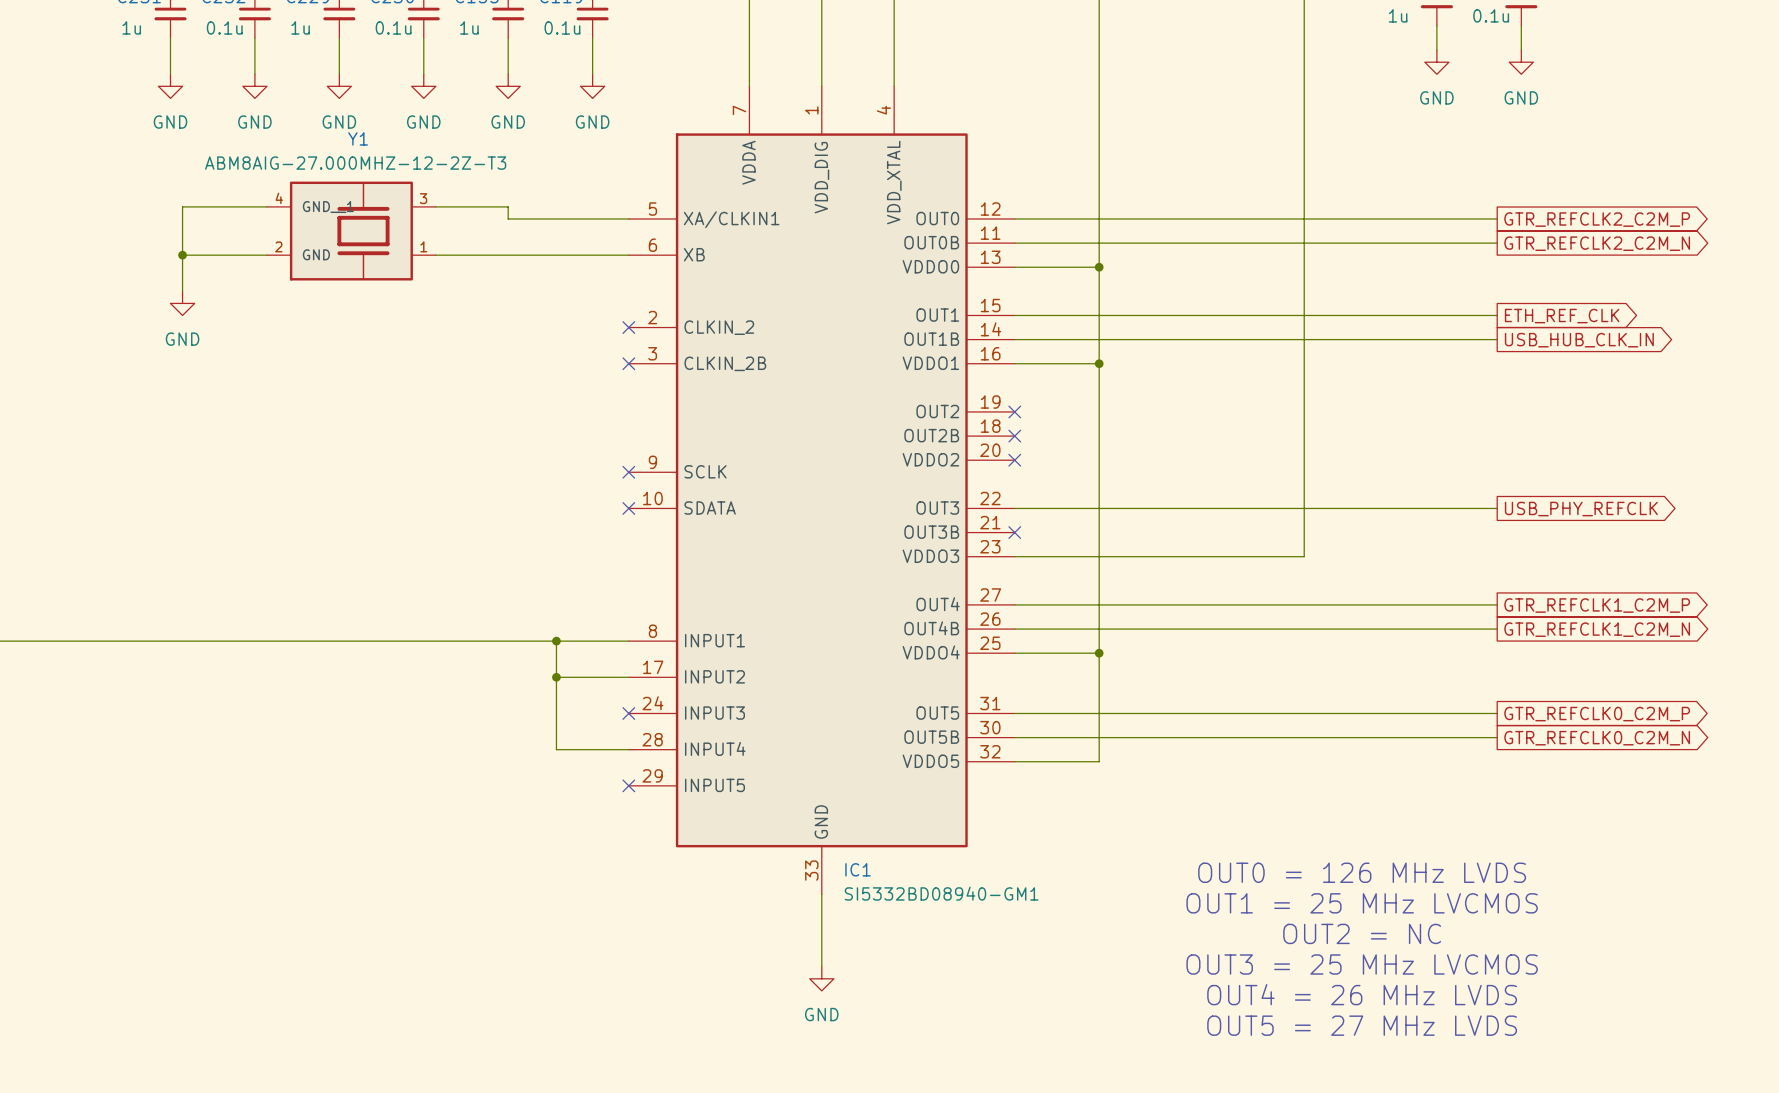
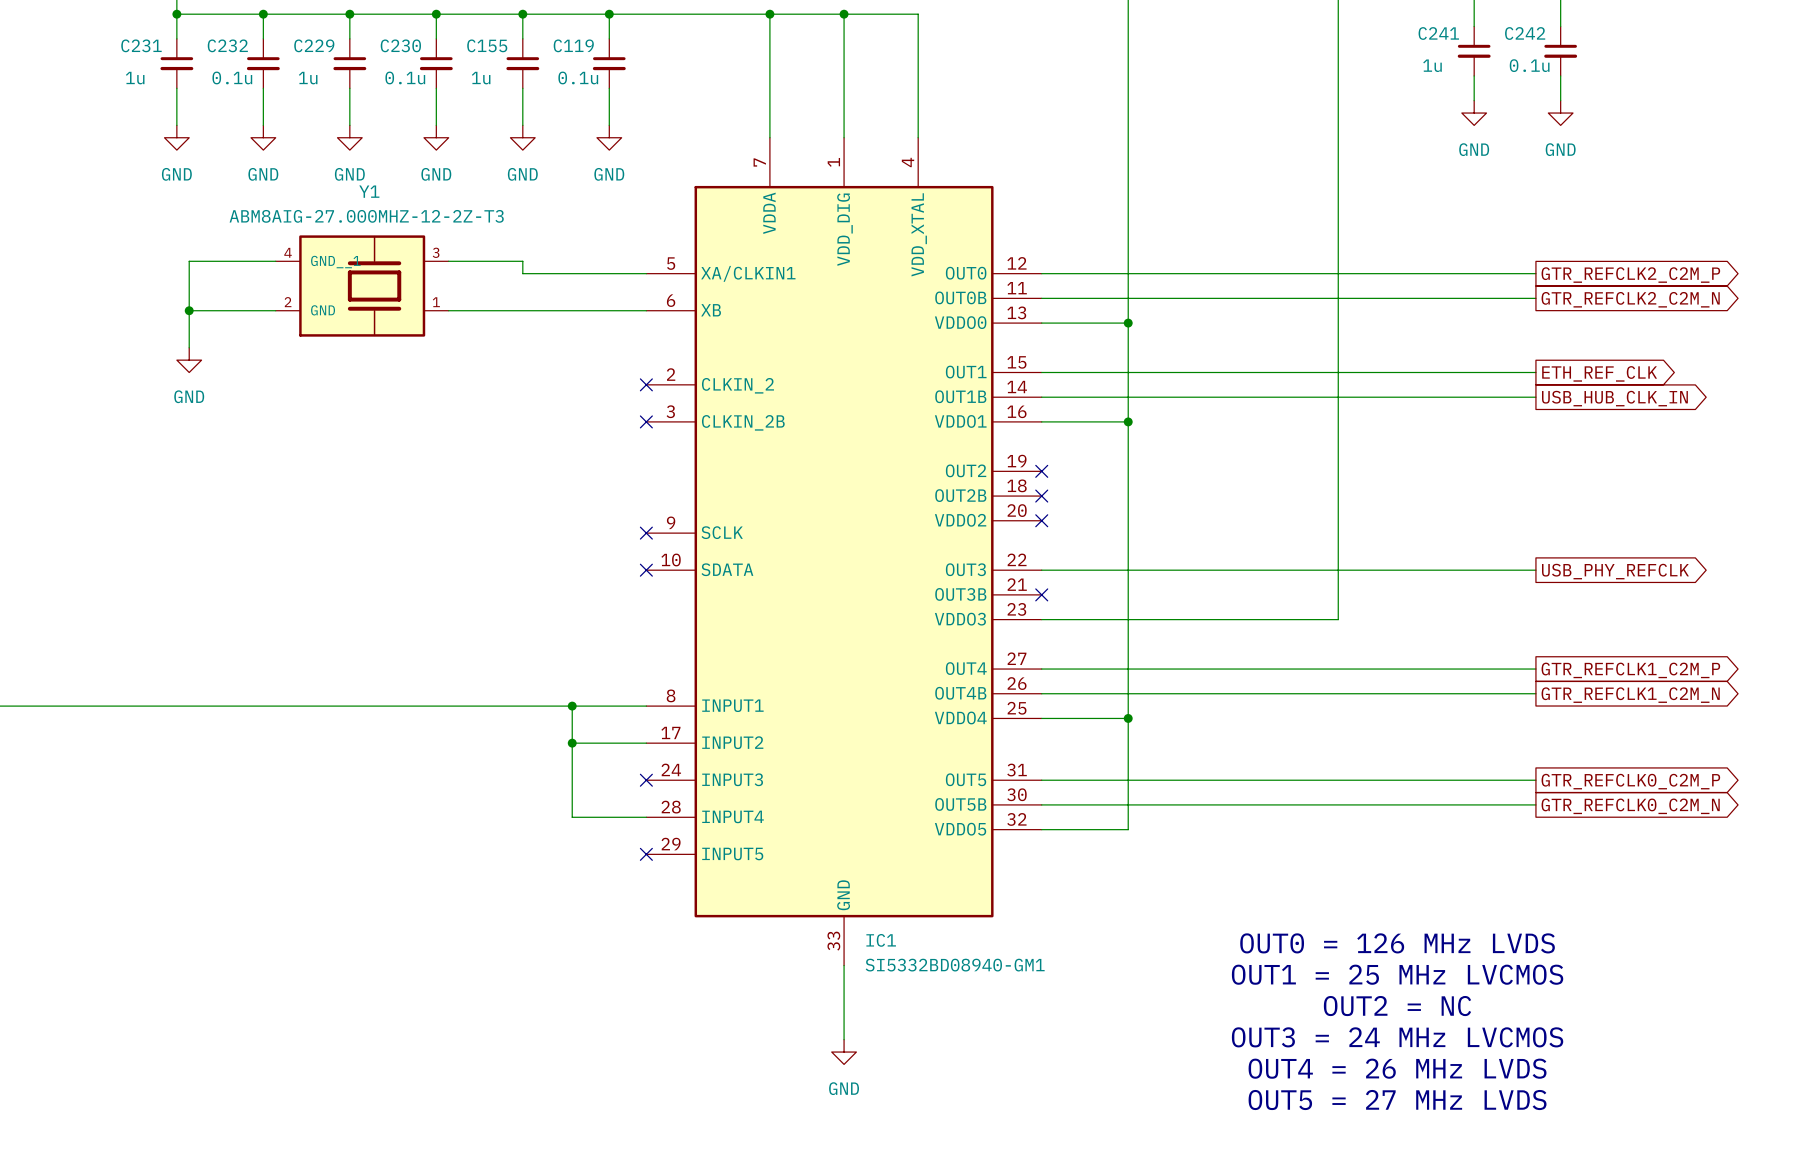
text: OUT3 = 25 MHz LVCMOS (1362, 964) -> OUT3 = 24 MHz LVCMOS (1397, 1037)

